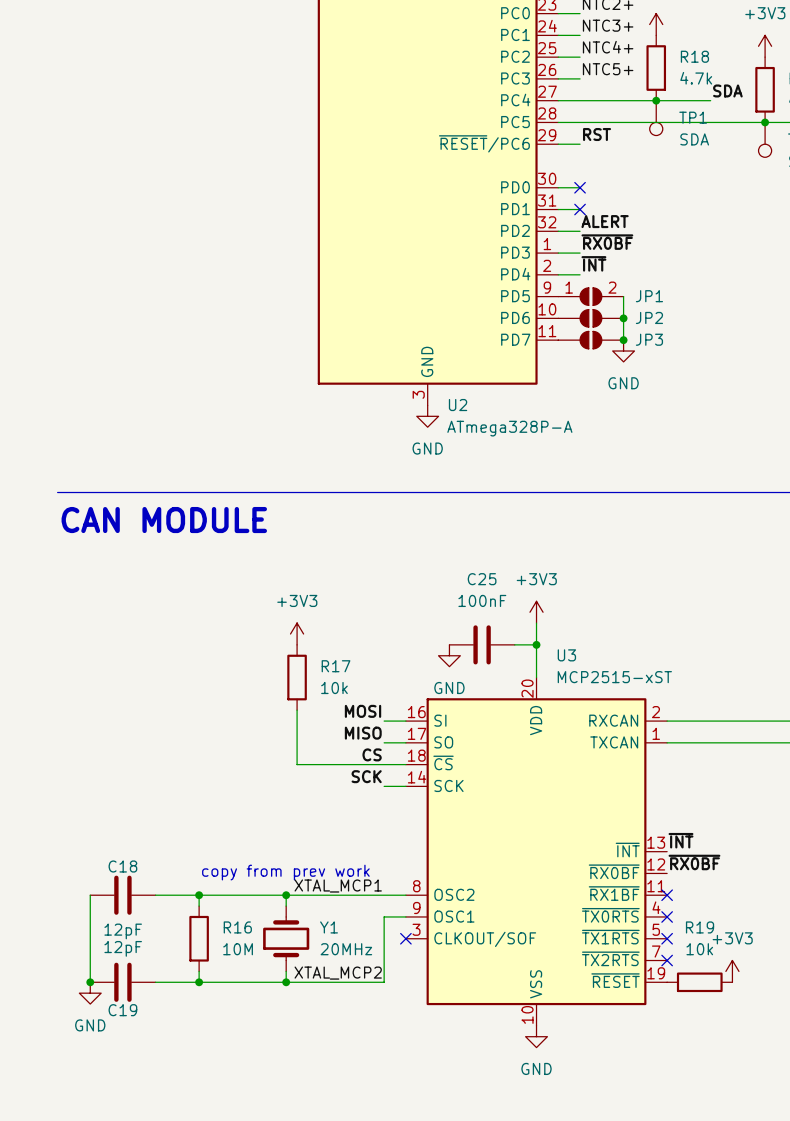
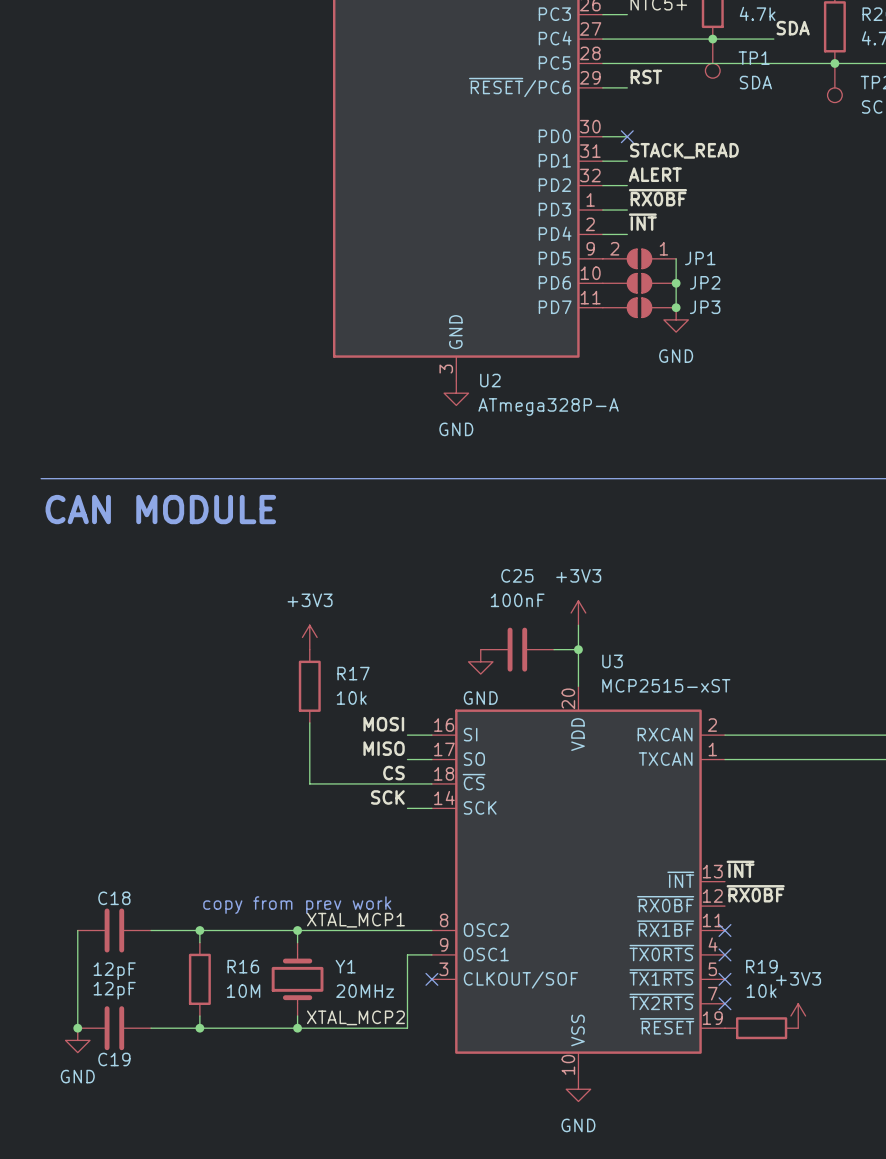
label: none -> STACK_READ (684, 150)
no-connect mark: (580, 209) -> none
JP1 rotation: 0° (590, 296) -> 180° (639, 258)

